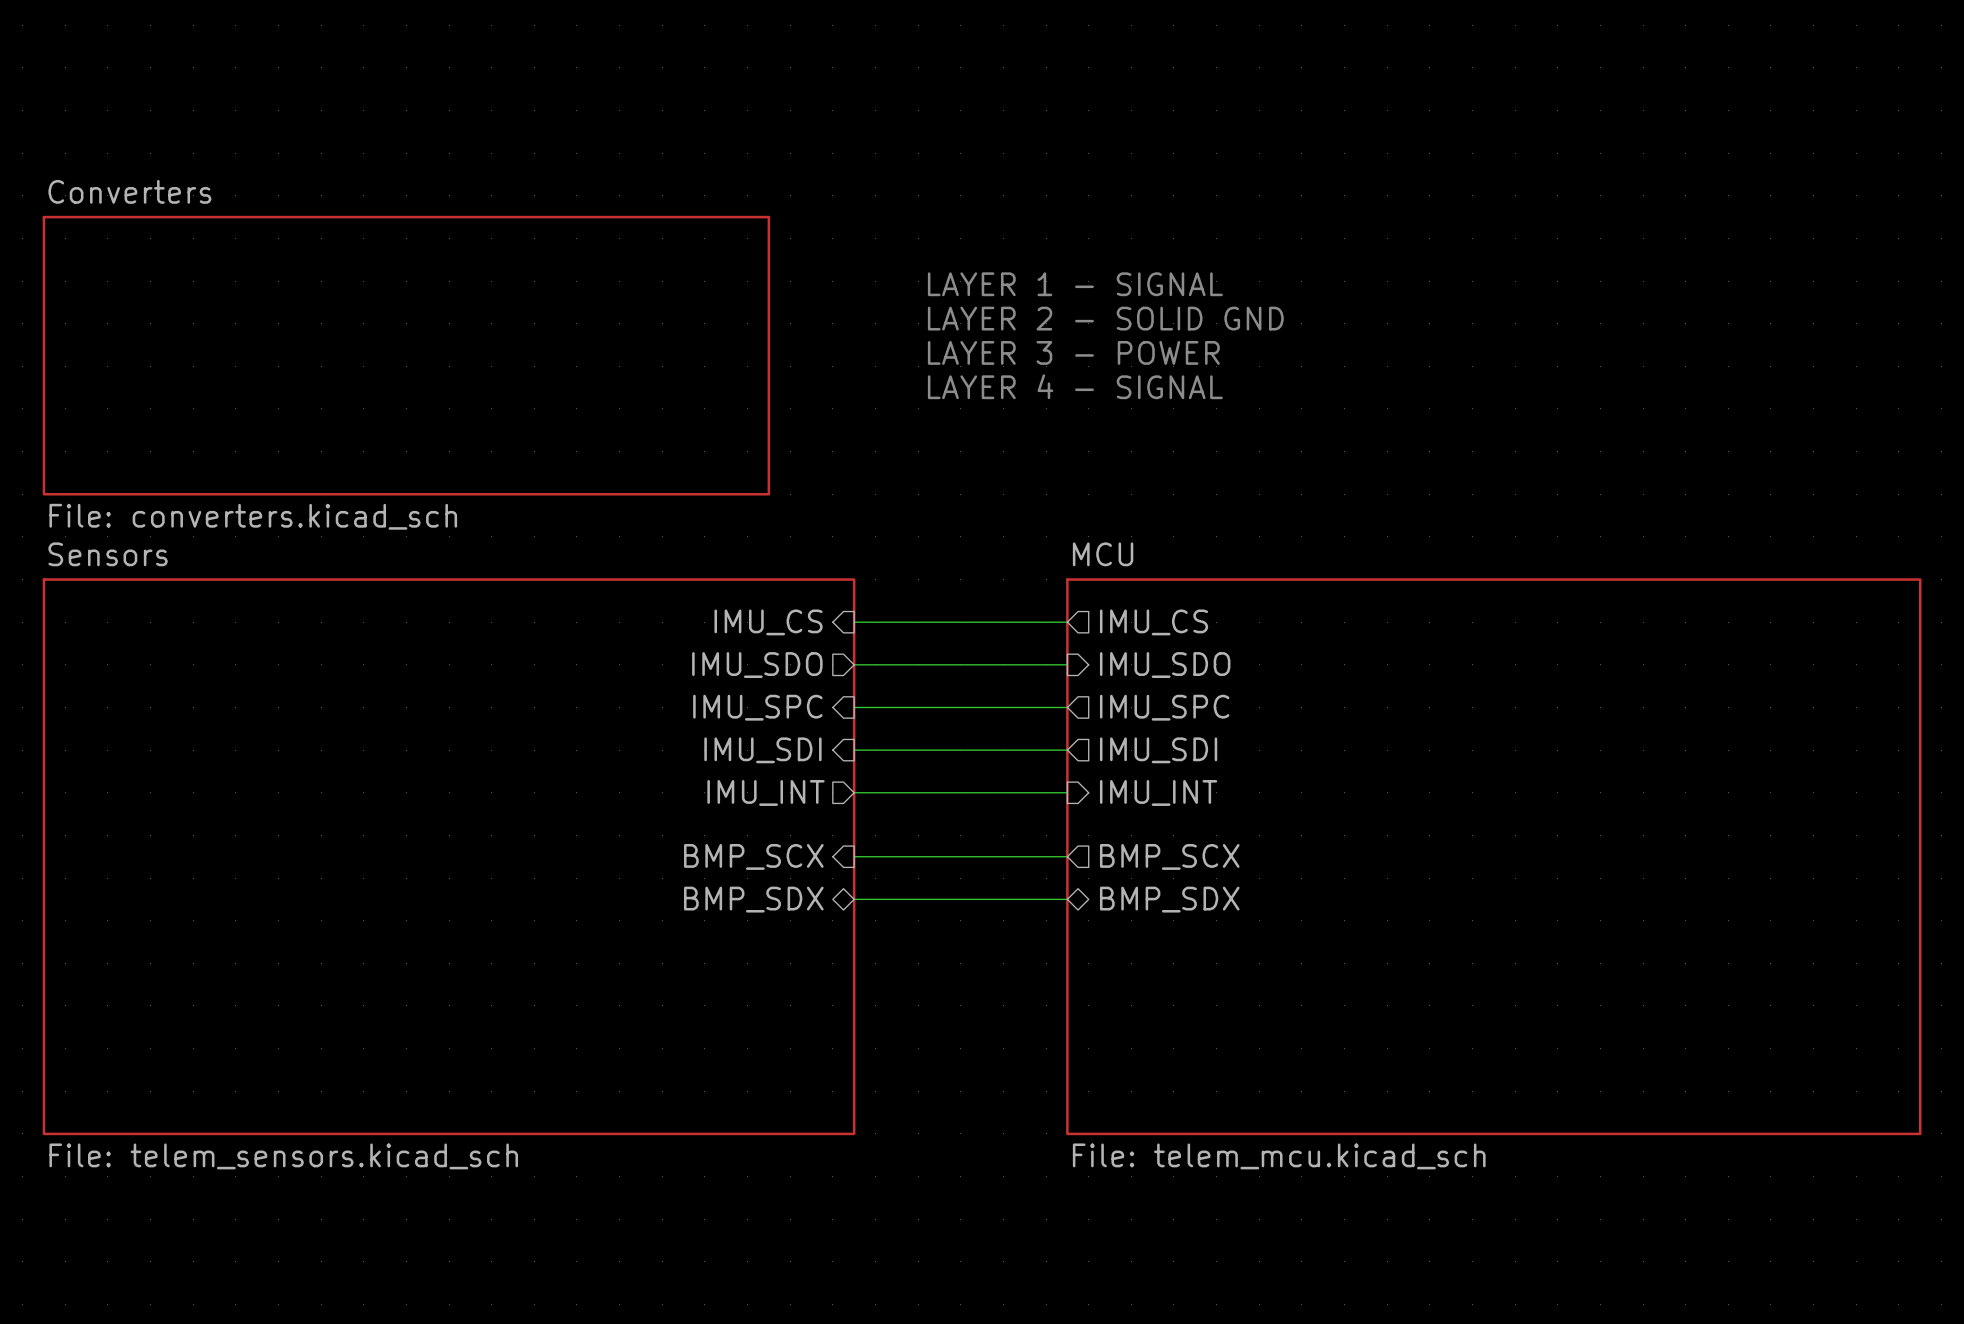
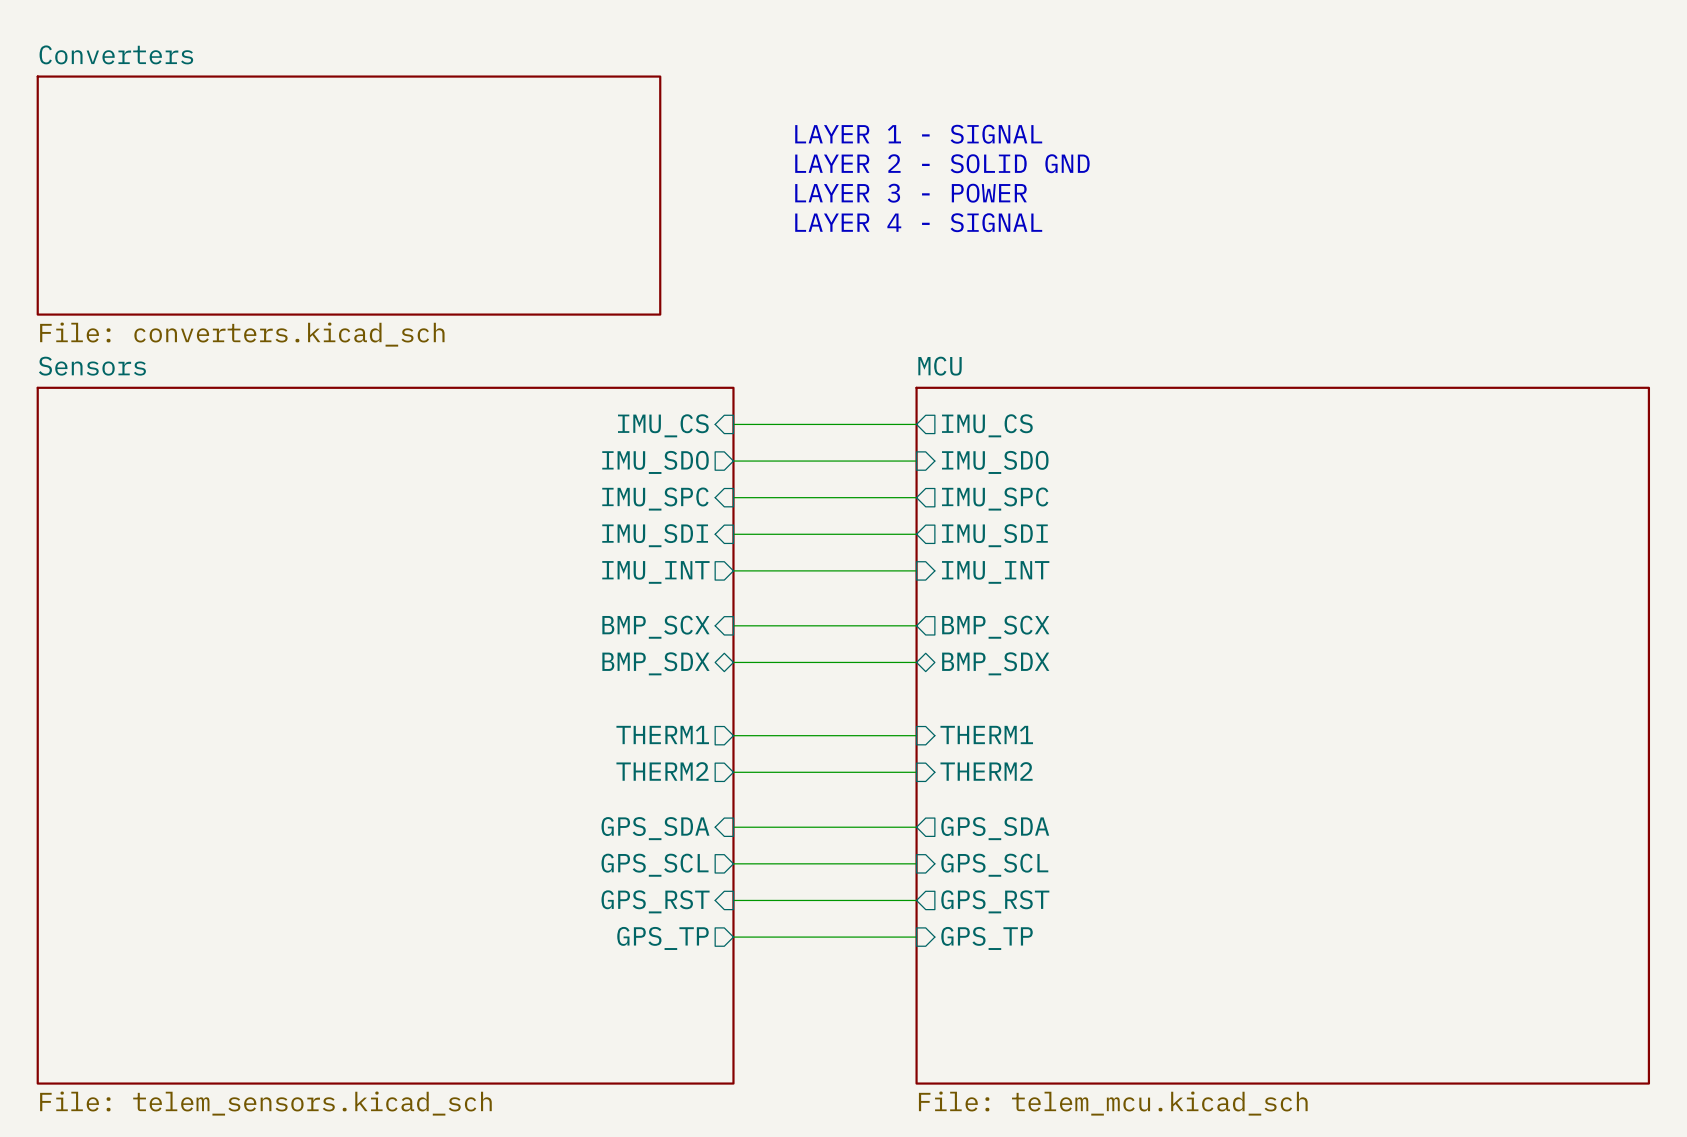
text position: LAYER 1 - SIGNAL (1075, 284) -> LAYER 1 - SIGNAL (918, 134)
text position: LAYER 2 - SOLID GND (1105, 318) -> LAYER 2 - SOLID GND (942, 163)
text position: LAYER 3 - POWER (1073, 352) -> LAYER 3 - POWER (911, 193)
sheet Converters position: (406, 355) -> (348, 195)
text position: LAYER 4 - SIGNAL (1075, 386) -> LAYER 4 - SIGNAL (918, 222)
sheet pin: none -> IMU_CS (663, 425)
sheet pin: none -> IMU_CS (987, 425)
sheet pin: none -> IMU_SDO (655, 462)
sheet pin: none -> IMU_SDO (995, 462)
sheet Sensors name position: Sensors (108, 554) -> Sensors (92, 366)
sheet MCU name position: MCU (1103, 554) -> MCU (940, 366)
sheet Sensors shape: [42, 578, 856, 1136] -> [36, 386, 735, 1085]
sheet MCU shape: [1066, 578, 1922, 1136] -> [915, 386, 1651, 1085]
sheet pin: IMU_CS (768, 622) -> IMU_SDI (655, 535)
sheet pin: IMU_CS (1154, 622) -> IMU_SDI (994, 535)
sheet pin: IMU_SDO (757, 665) -> IMU_INT (655, 572)
sheet pin: IMU_SDO (1165, 665) -> IMU_INT (995, 572)
sheet pin position: IMU_SPC (757, 707) -> IMU_SPC (655, 499)
wire: (854, 707) (1067, 707) -> (733, 424) (916, 424)
sheet pin position: IMU_SPC (1164, 707) -> IMU_SPC (995, 499)
wire: none -> (733, 625) (916, 625)
sheet pin: none -> BMP_SCX (655, 627)
sheet pin: none -> BMP_SCX (995, 627)
sheet pin: IMU_SDI (762, 750) -> none
wire: (854, 750) (1067, 750) -> (733, 461) (916, 461)
sheet pin: IMU_SDI (1158, 750) -> none
sheet pin: none -> BMP_SDX (655, 663)
wire: none -> (733, 662) (916, 662)
sheet pin: none -> BMP_SDX (995, 663)
sheet pin: IMU_INT (766, 792) -> none
wire: (854, 792) (1067, 792) -> (733, 497) (916, 497)
sheet pin: IMU_INT (1158, 792) -> none
sheet pin shape: input (753, 856) -> output (662, 734)
sheet pin: BMP_SCX (753, 856) -> THERM1 (662, 734)
sheet pin shape: output (1169, 856) -> input (986, 734)
sheet pin: BMP_SCX (1169, 856) -> THERM1 (986, 734)
sheet pin shape: bidirectional (753, 899) -> output (662, 771)
sheet pin: BMP_SDX (753, 899) -> THERM2 (662, 771)
sheet pin shape: bidirectional (1169, 899) -> input (986, 771)
sheet pin: BMP_SDX (1169, 899) -> THERM2 (986, 771)
sheet pin: none -> GPS_SDA (655, 828)
wire: none -> (733, 827) (916, 827)
sheet pin: none -> GPS_SDA (995, 828)
wire: none -> (733, 863) (916, 863)
sheet pin: none -> GPS_SCL (655, 865)
sheet pin: none -> GPS_SCL (994, 865)
sheet pin: none -> GPS_RST (655, 901)
wire: none -> (733, 900) (916, 900)
sheet pin: none -> GPS_RST (995, 901)
sheet pin: none -> GPS_TP (662, 938)
wire: none -> (733, 937) (916, 937)
sheet pin: none -> GPS_TP (987, 938)
sheet Sensors value position: File: telem_sensors.kicad_sch (283, 1156) -> File: telem_sensors.kicad_sch (265, 1103)
sheet MCU value position: File: telem_mcu.kicad_sch (1279, 1156) -> File: telem_mcu.kicad_sch (1113, 1103)

